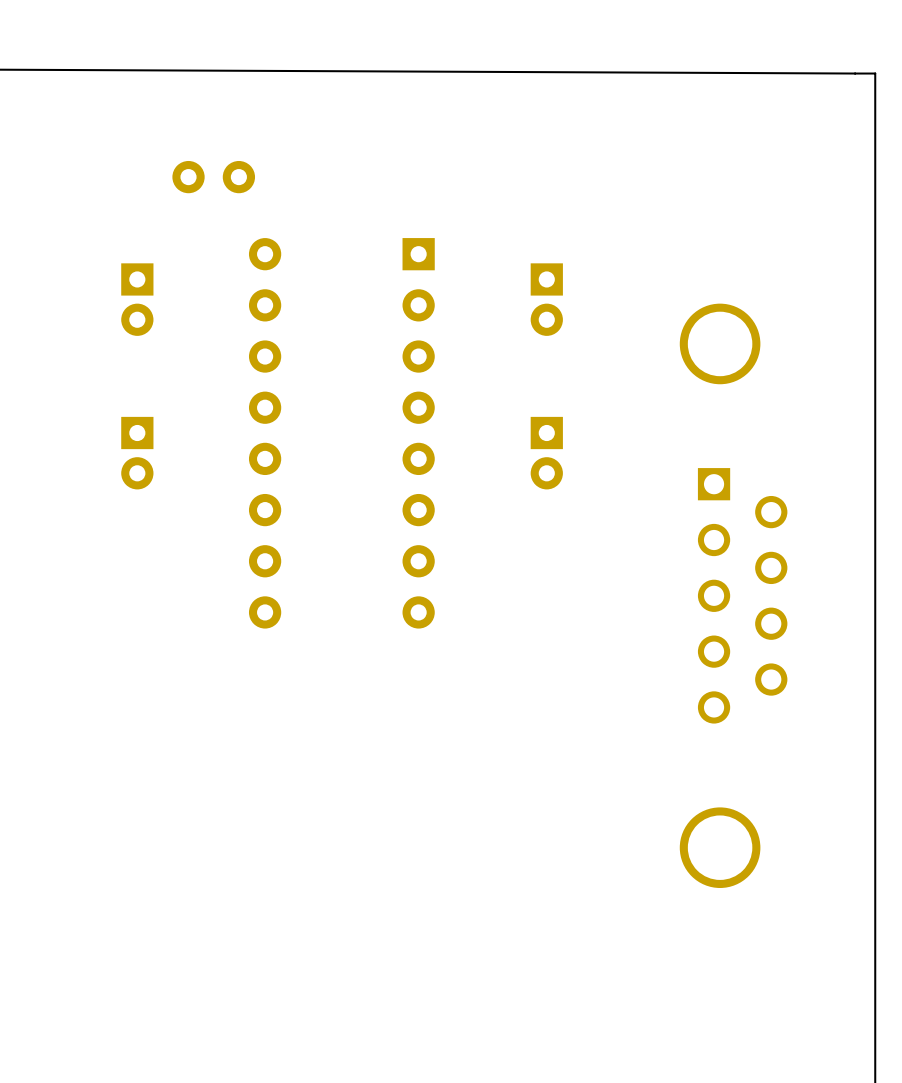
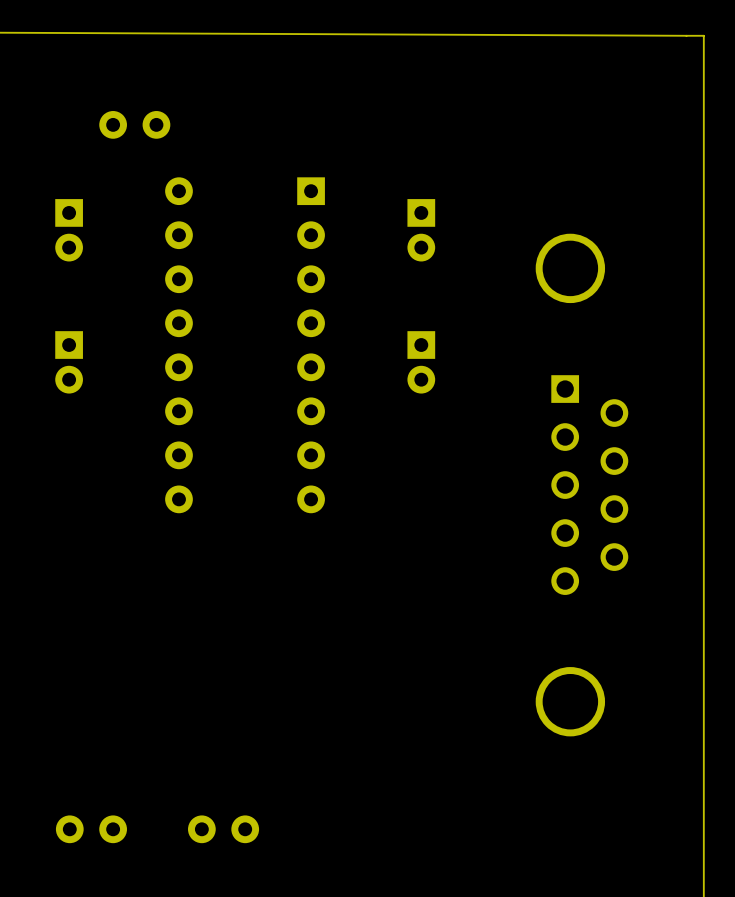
part: none -> (91, 829)
part: none -> (223, 829)

